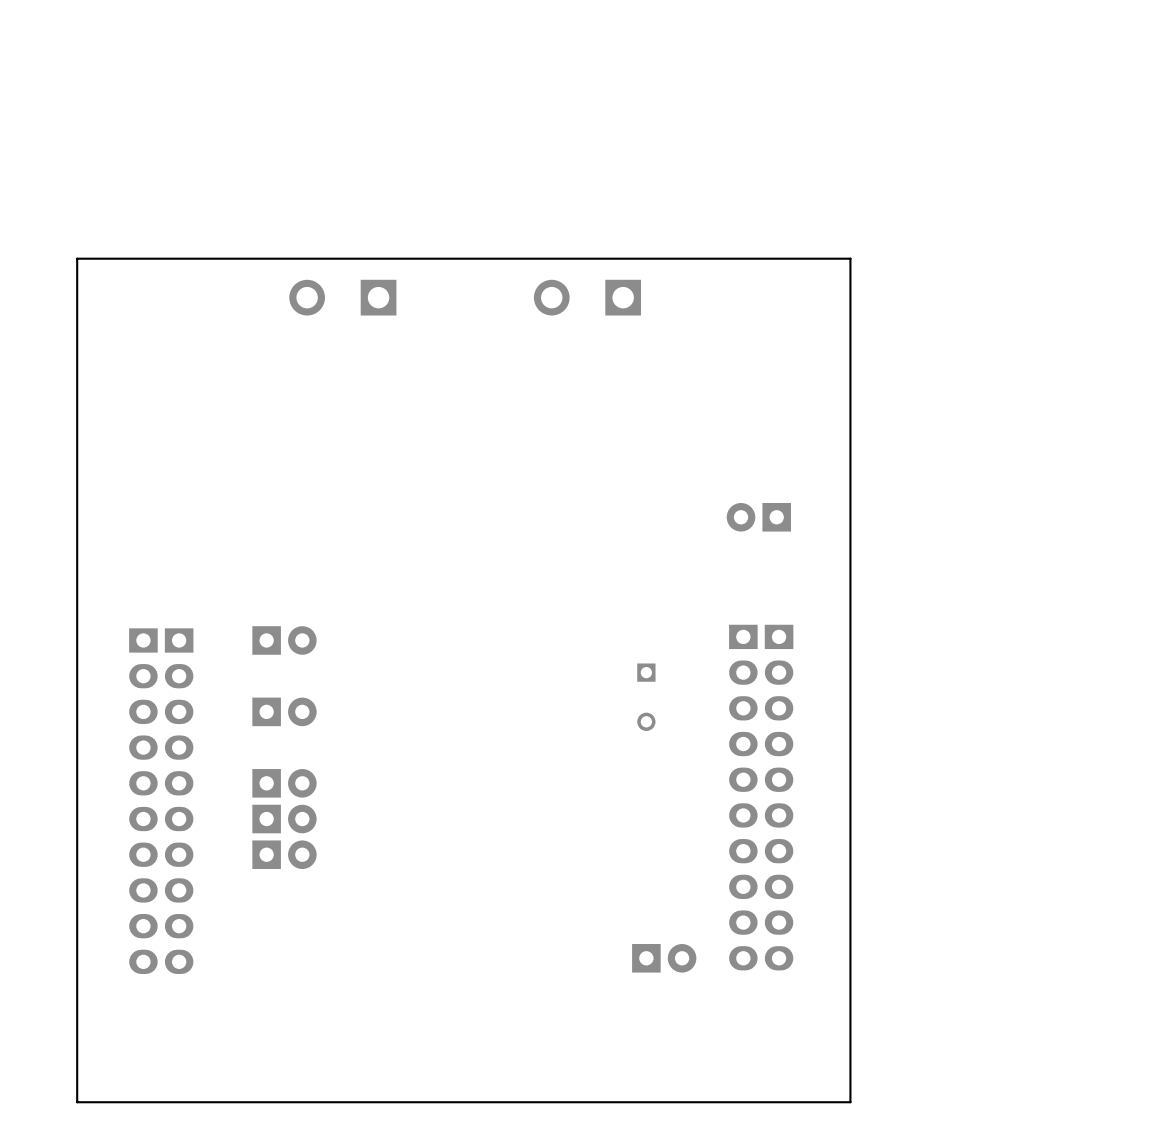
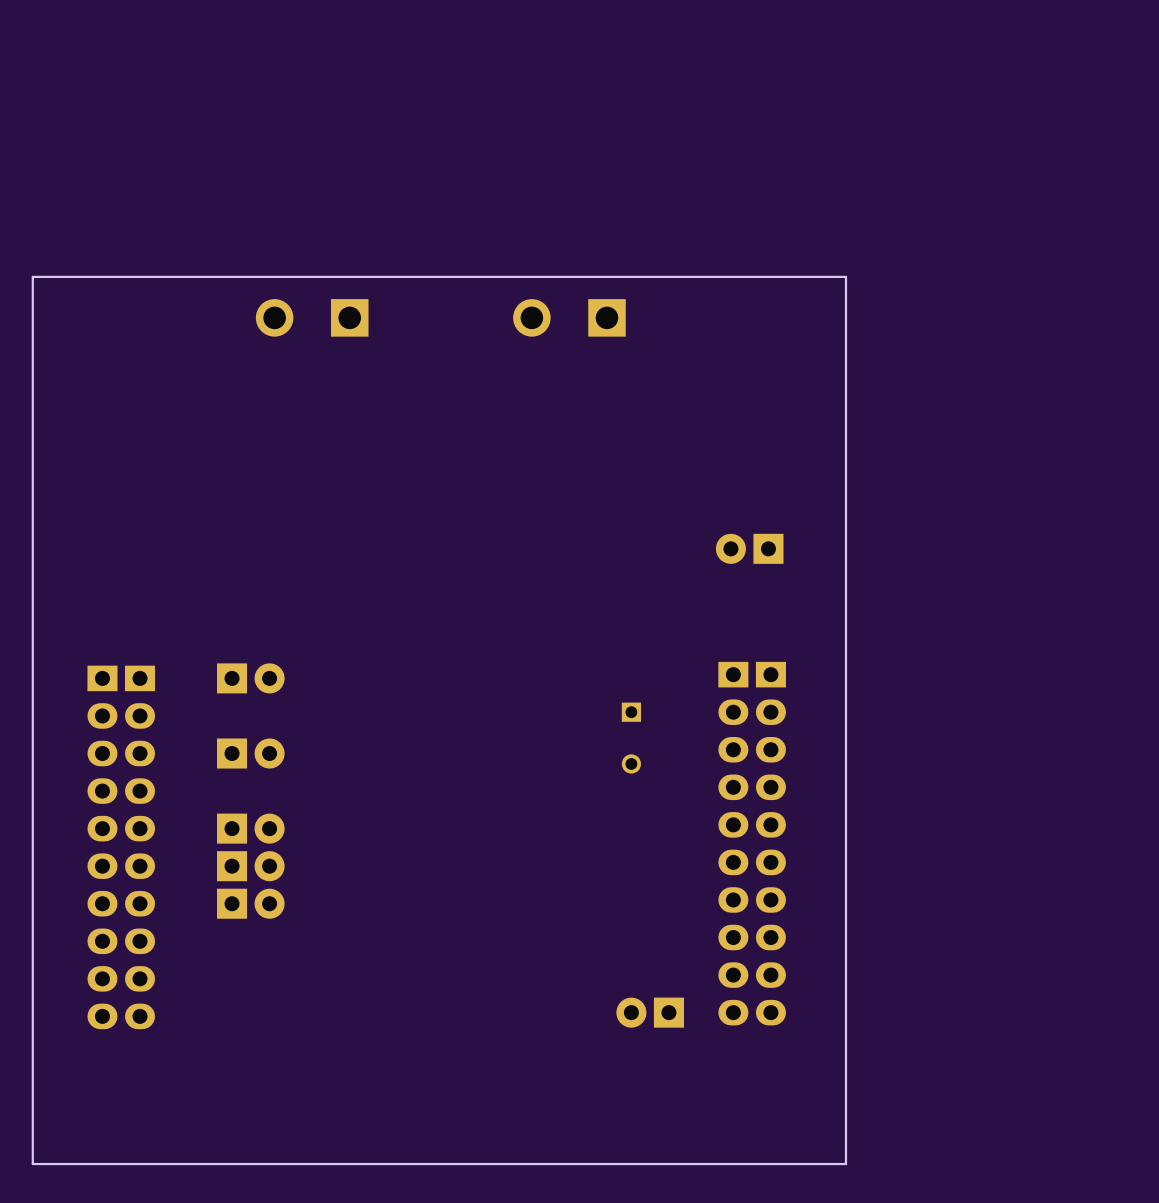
part rotation: 0° (664, 958) -> 180° (650, 1012)

